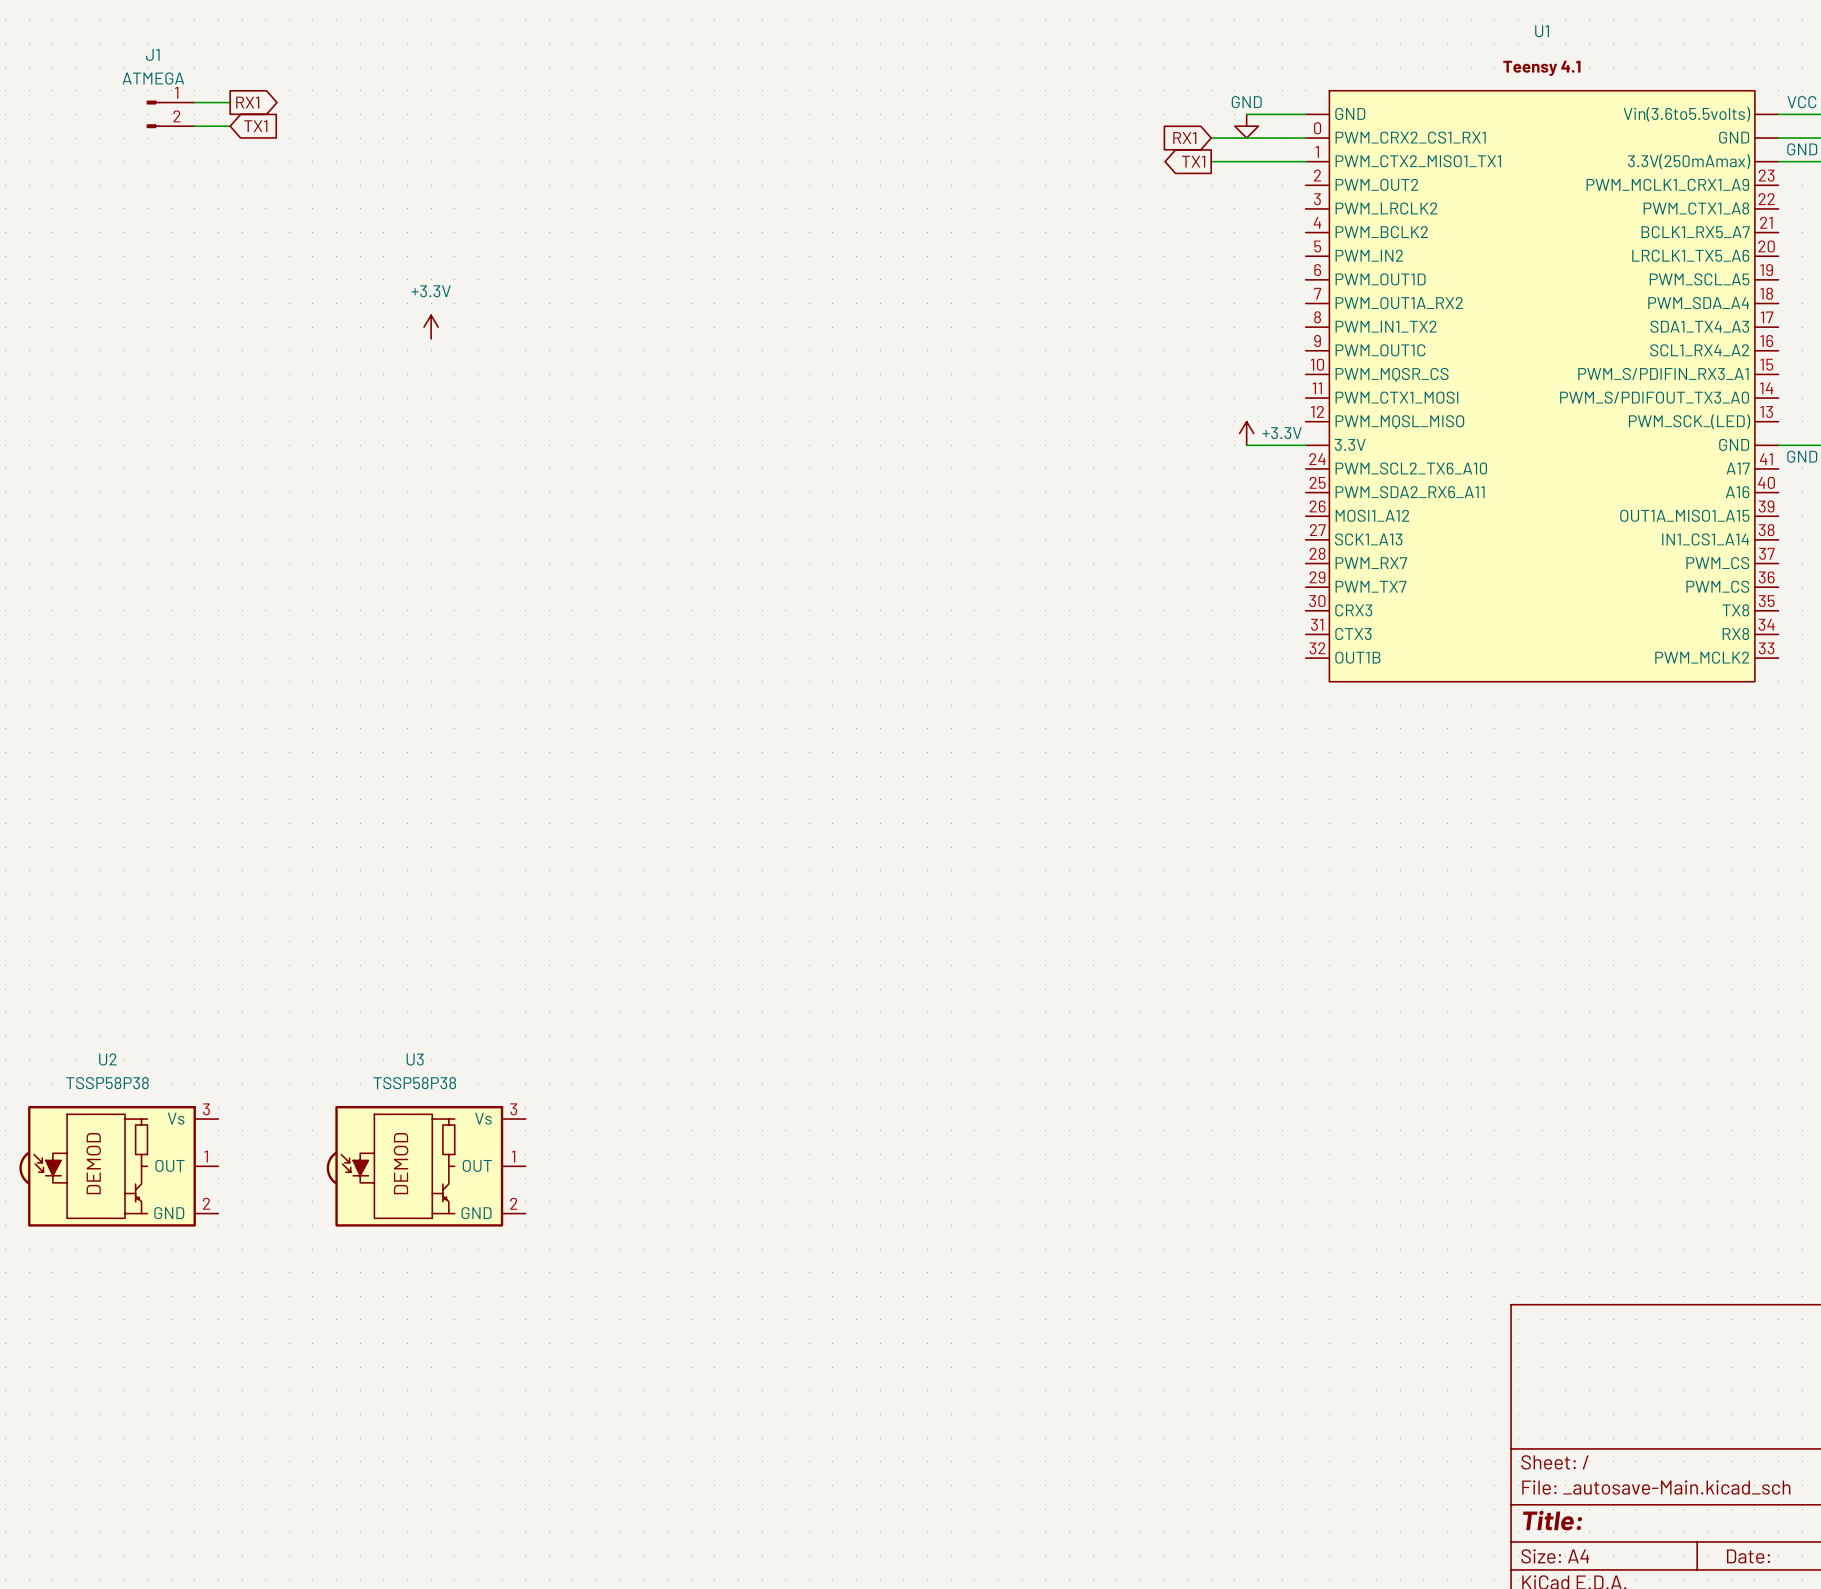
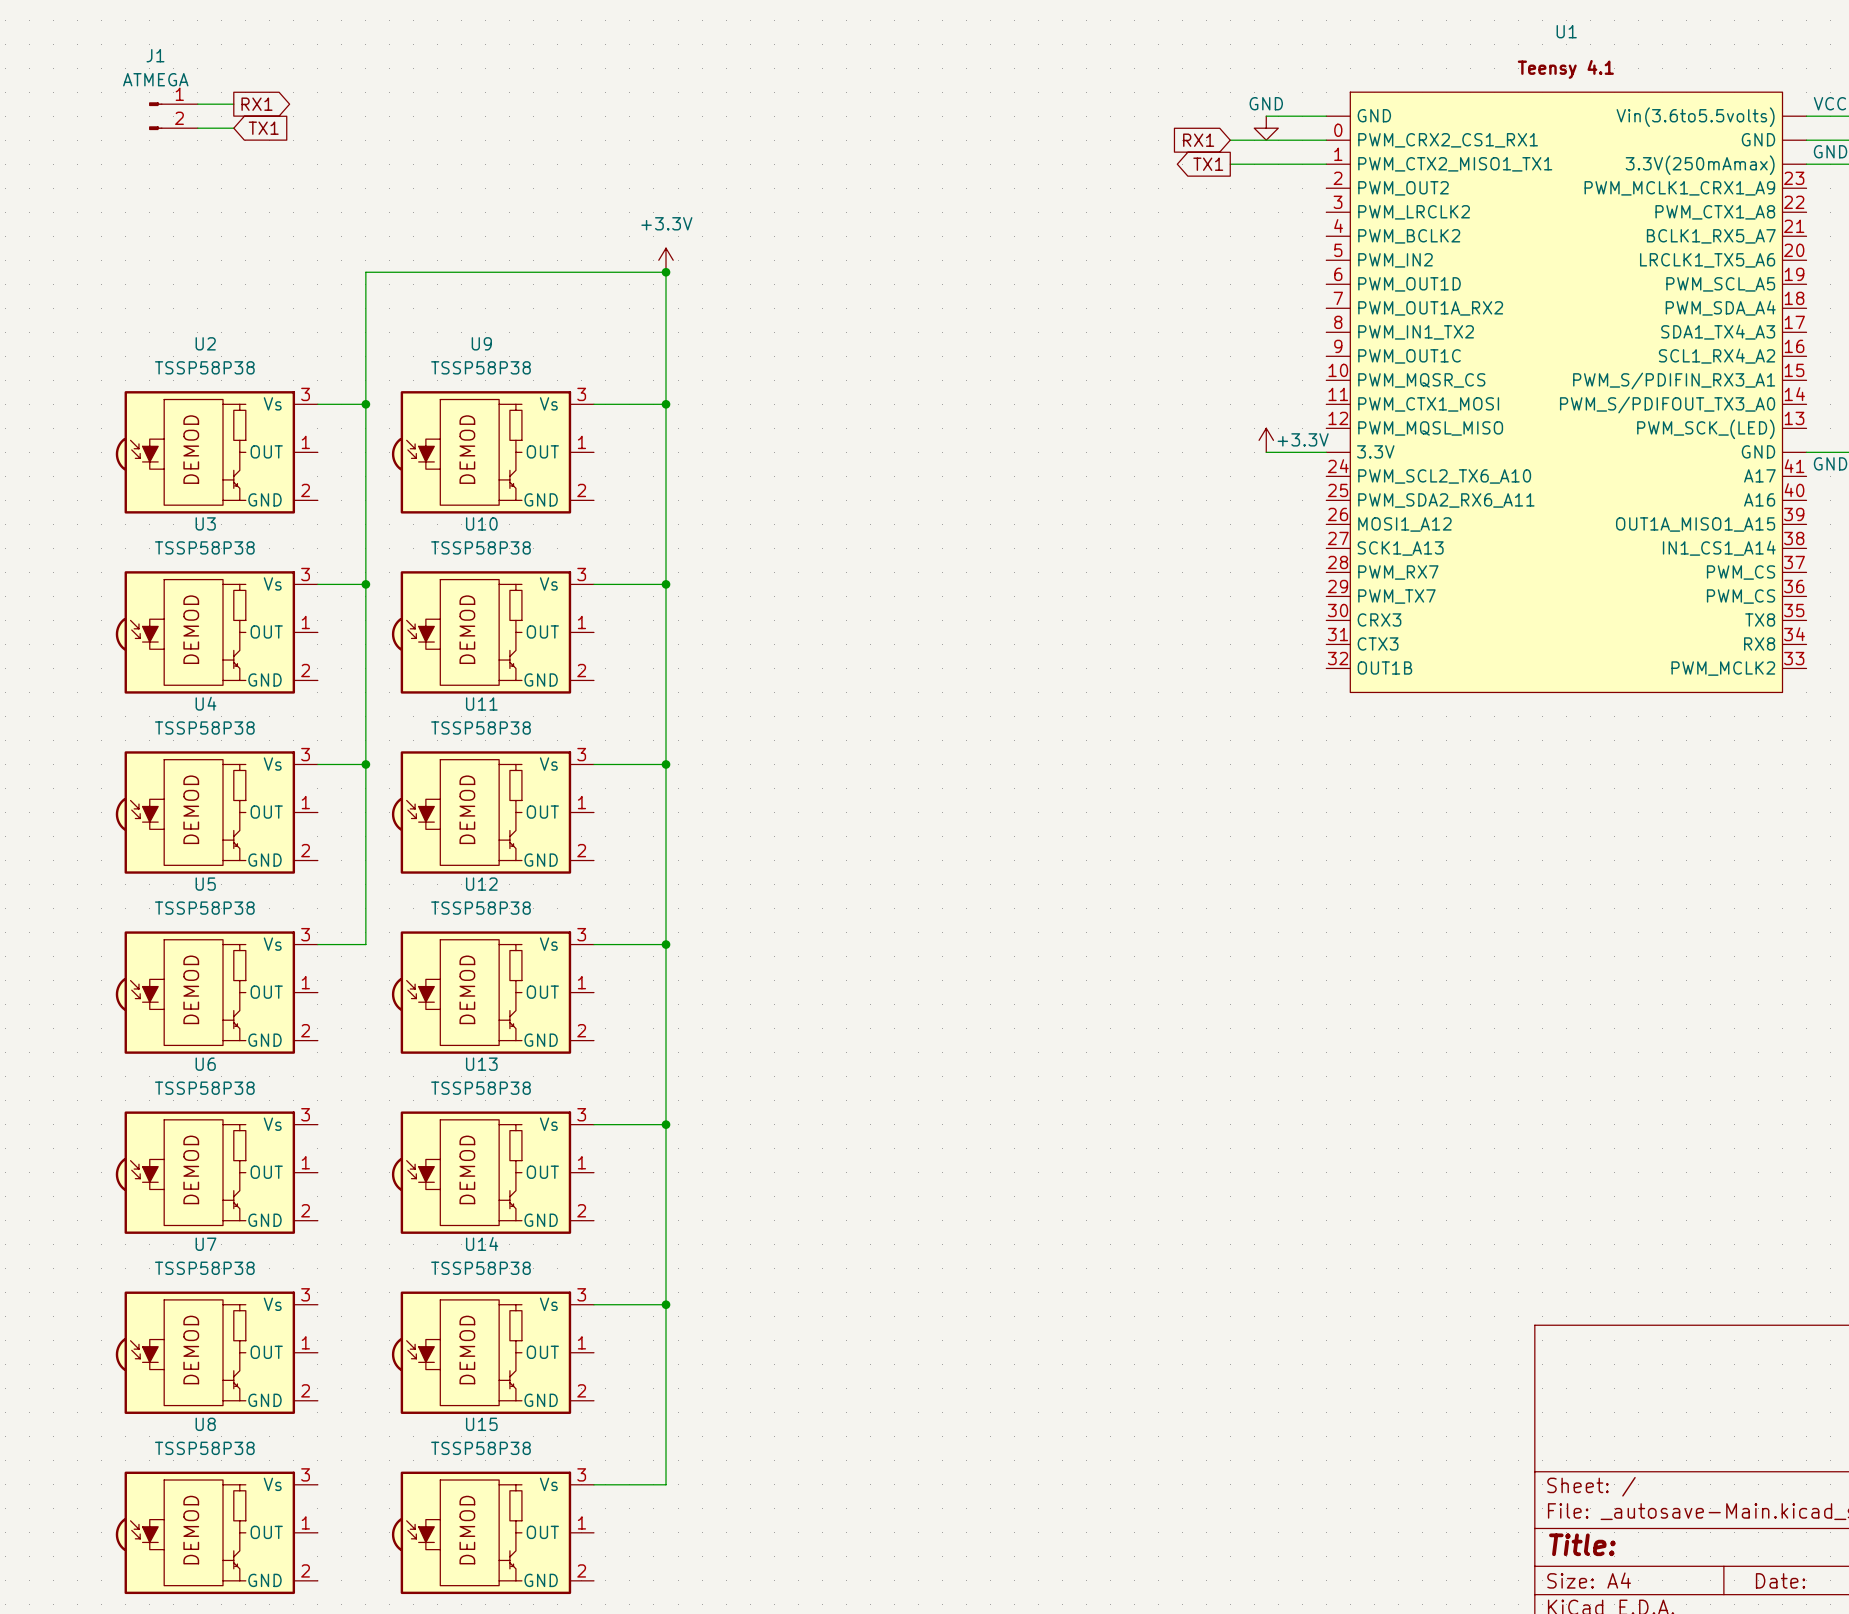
power symbol: none -> +3.3V (666, 260)
junction: none -> (666, 272)
power symbol: +3.3V (431, 327) -> none
wire: none -> (317, 404) (365, 404)
junction: none -> (365, 404)
wire: none -> (593, 404) (666, 404)
junction: none -> (666, 404)
U9: none -> TSSP58P38 (492, 452)
wire: none -> (317, 584) (365, 584)
junction: none -> (365, 584)
wire: none -> (593, 584) (666, 584)
junction: none -> (666, 584)
U10: none -> TSSP58P38 (492, 632)
wire: none -> (317, 764) (365, 764)
junction: none -> (365, 764)
wire: none -> (593, 764) (666, 764)
junction: none -> (666, 764)
U4: none -> TSSP58P38 (216, 812)
U11: none -> TSSP58P38 (492, 812)
wire: none -> (317, 944) (365, 944) (365, 272) (666, 272) (666, 1484) (593, 1484)
wire: none -> (593, 944) (666, 944)
junction: none -> (666, 944)
U5: none -> TSSP58P38 (216, 992)
U12: none -> TSSP58P38 (492, 992)
wire: none -> (593, 1124) (666, 1124)
junction: none -> (666, 1124)
U6: none -> TSSP58P38 (216, 1172)
U13: none -> TSSP58P38 (492, 1172)
U2 position: (118, 1166) -> (216, 452)
U3 position: (426, 1166) -> (216, 632)
wire: none -> (593, 1304) (666, 1304)
junction: none -> (666, 1304)
U7: none -> TSSP58P38 (216, 1352)
U14: none -> TSSP58P38 (492, 1352)
U8: none -> TSSP58P38 (216, 1532)
U15: none -> TSSP58P38 (492, 1532)

